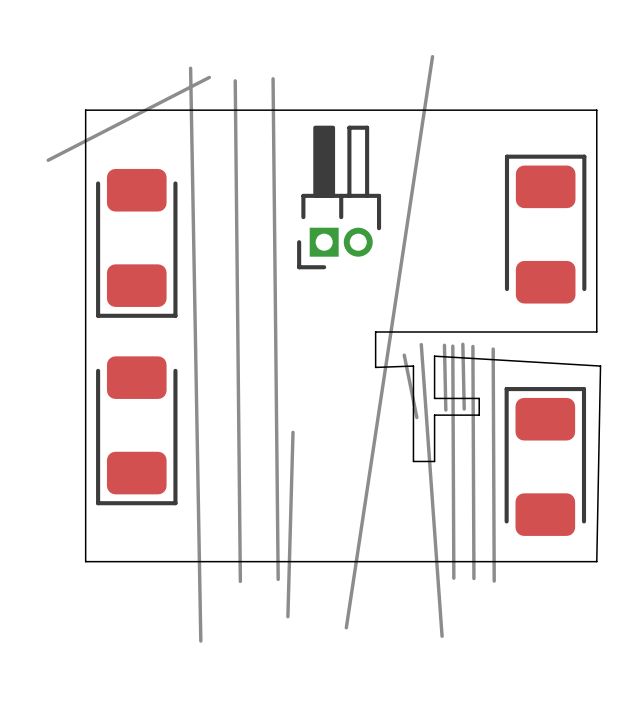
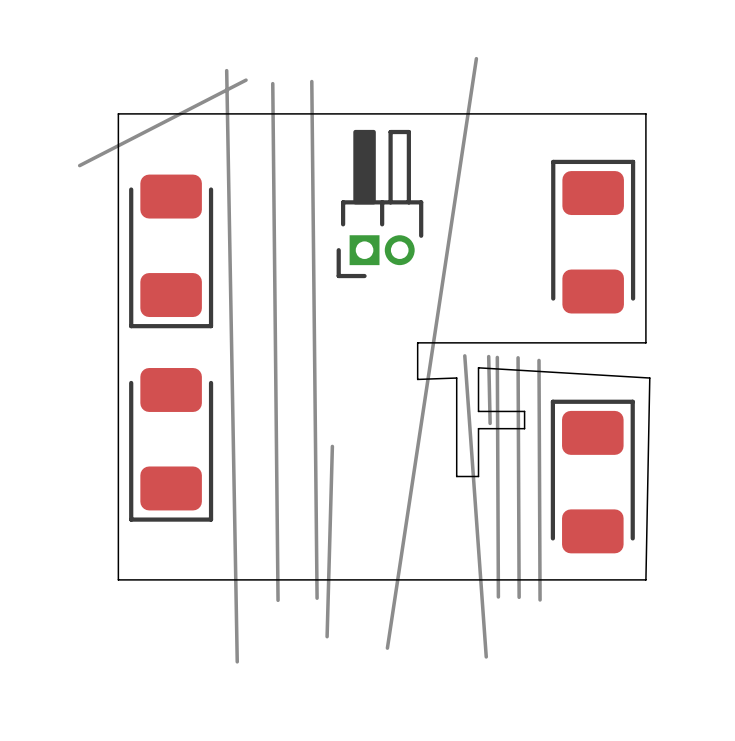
line: (462, 344) (464, 409) -> none
line: (404, 355) (416, 417) -> none

